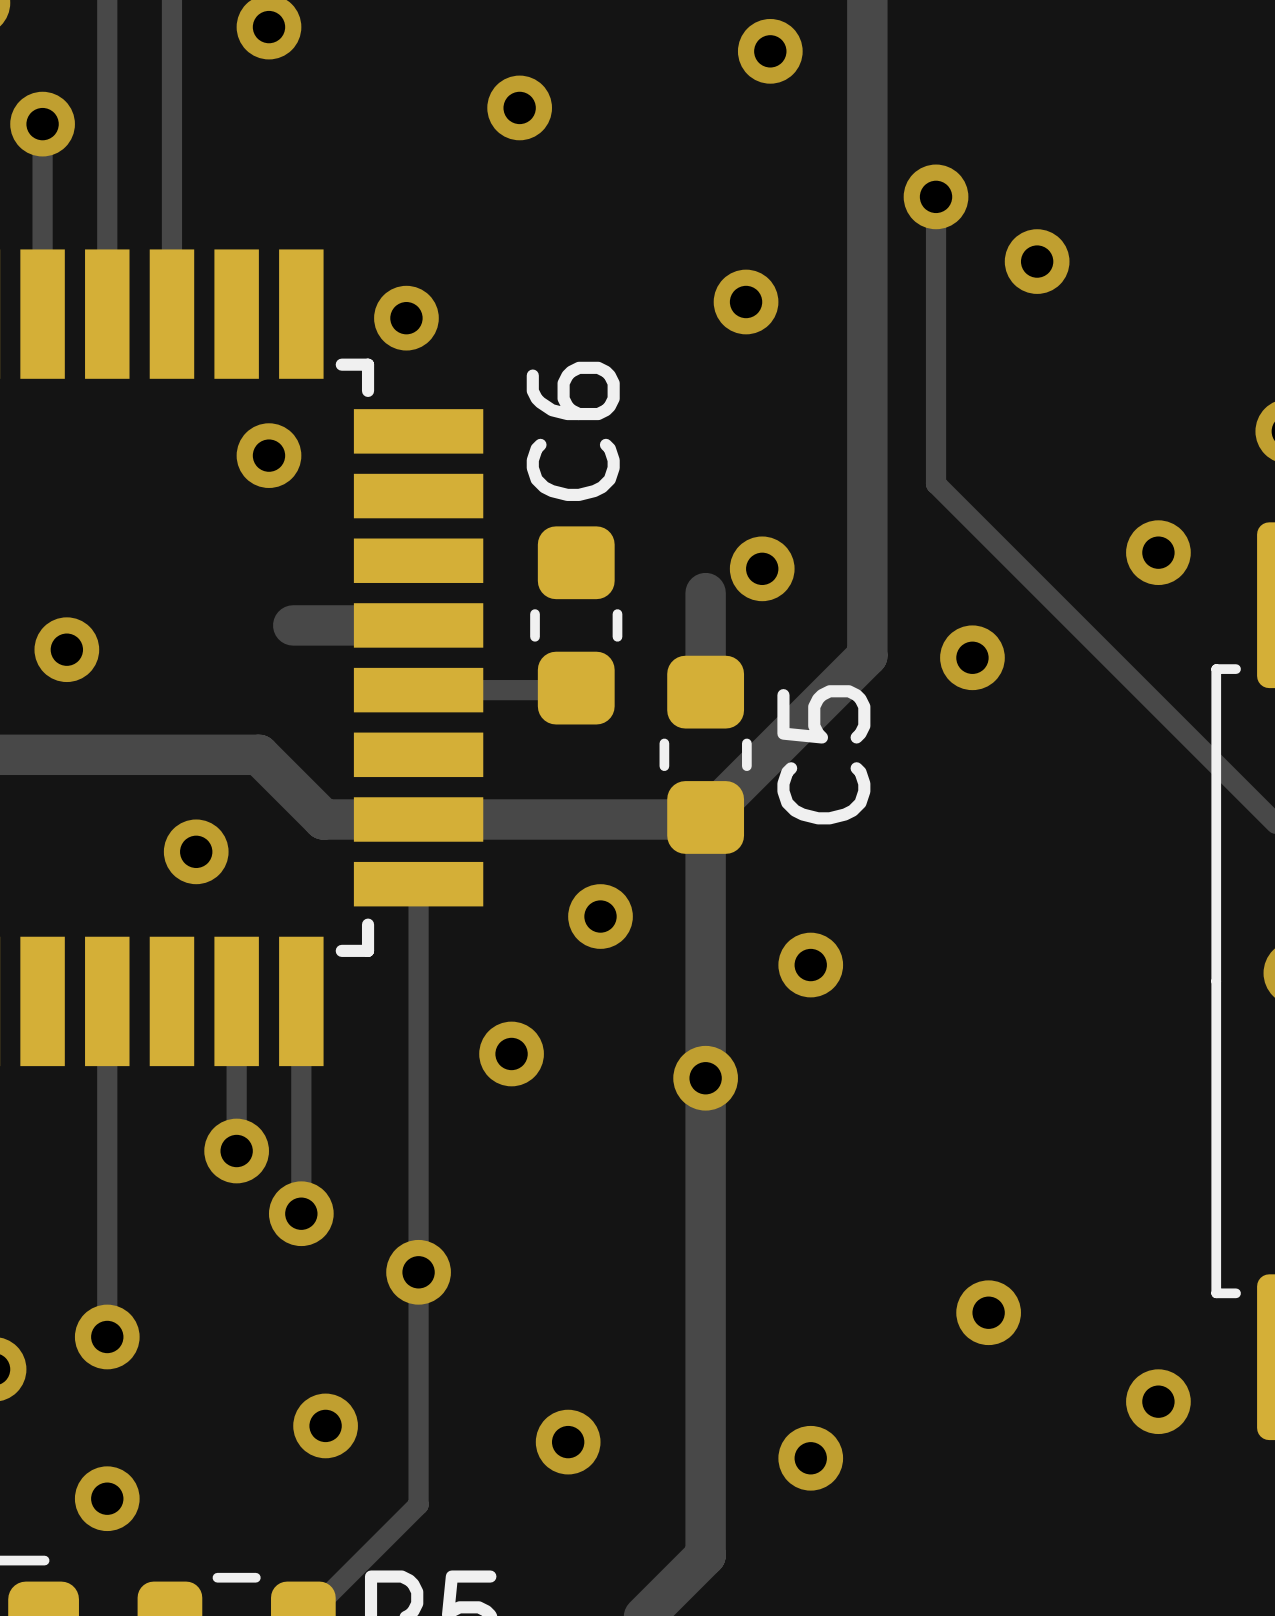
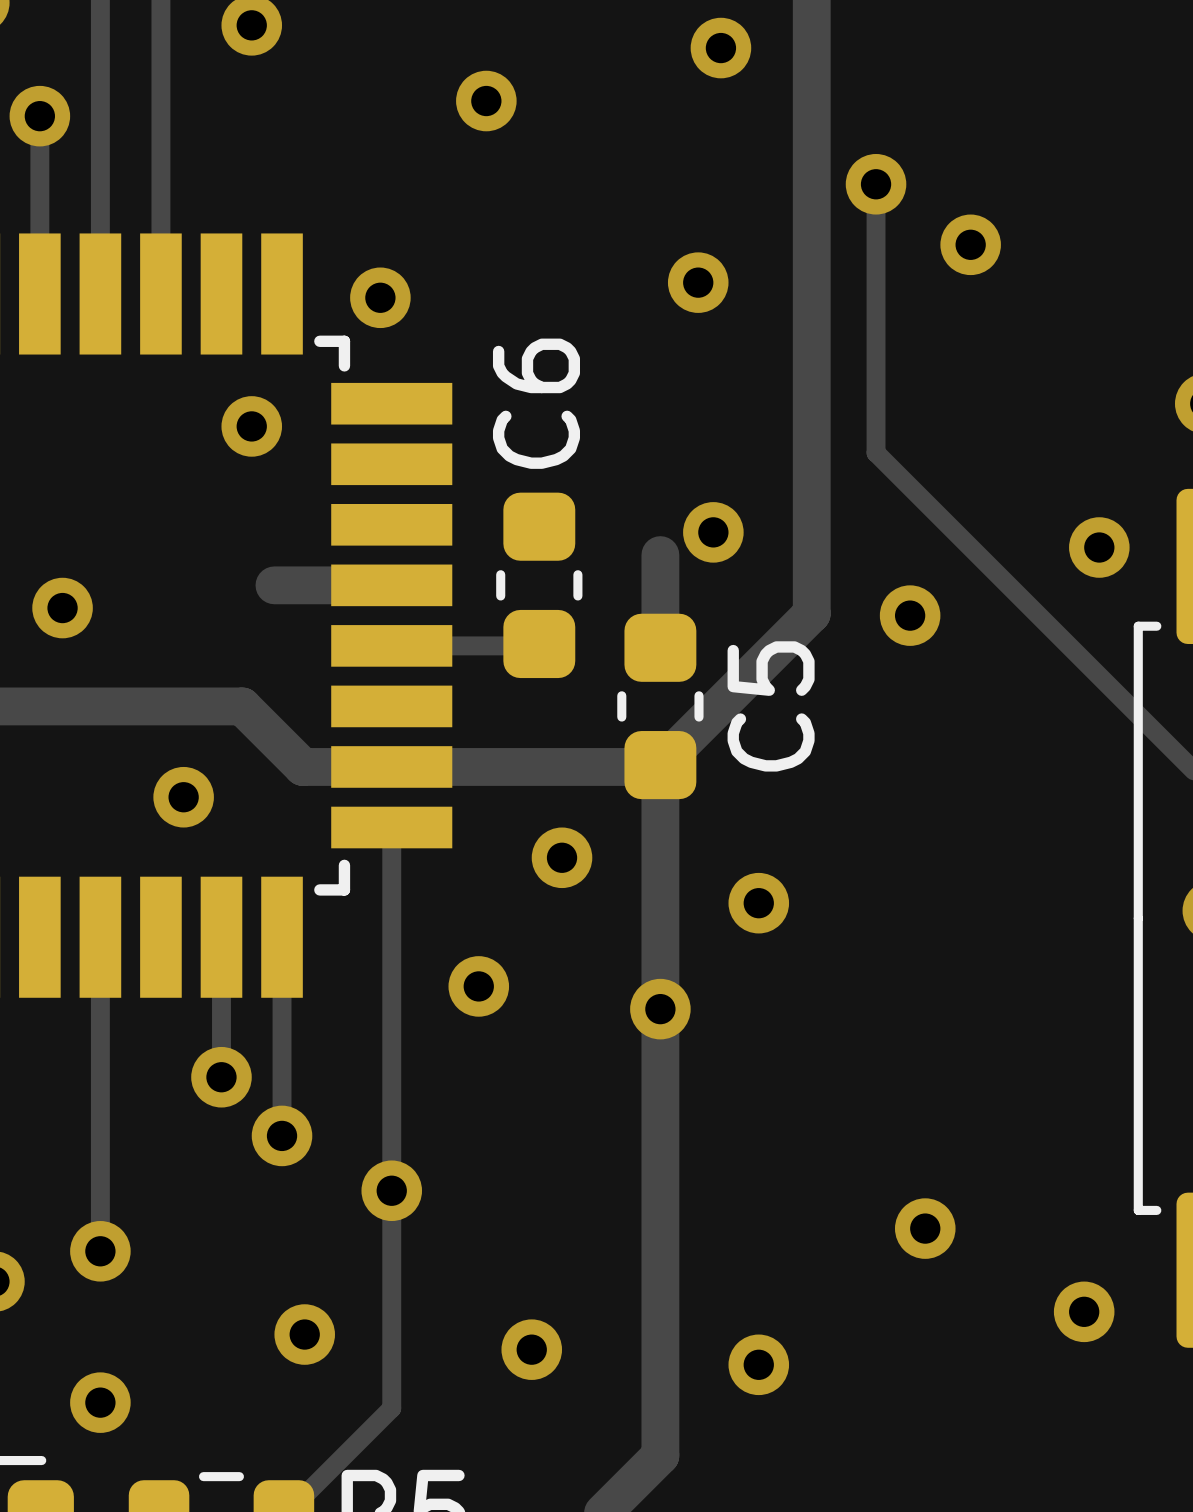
via position: (1158, 552) -> (1099, 547)

